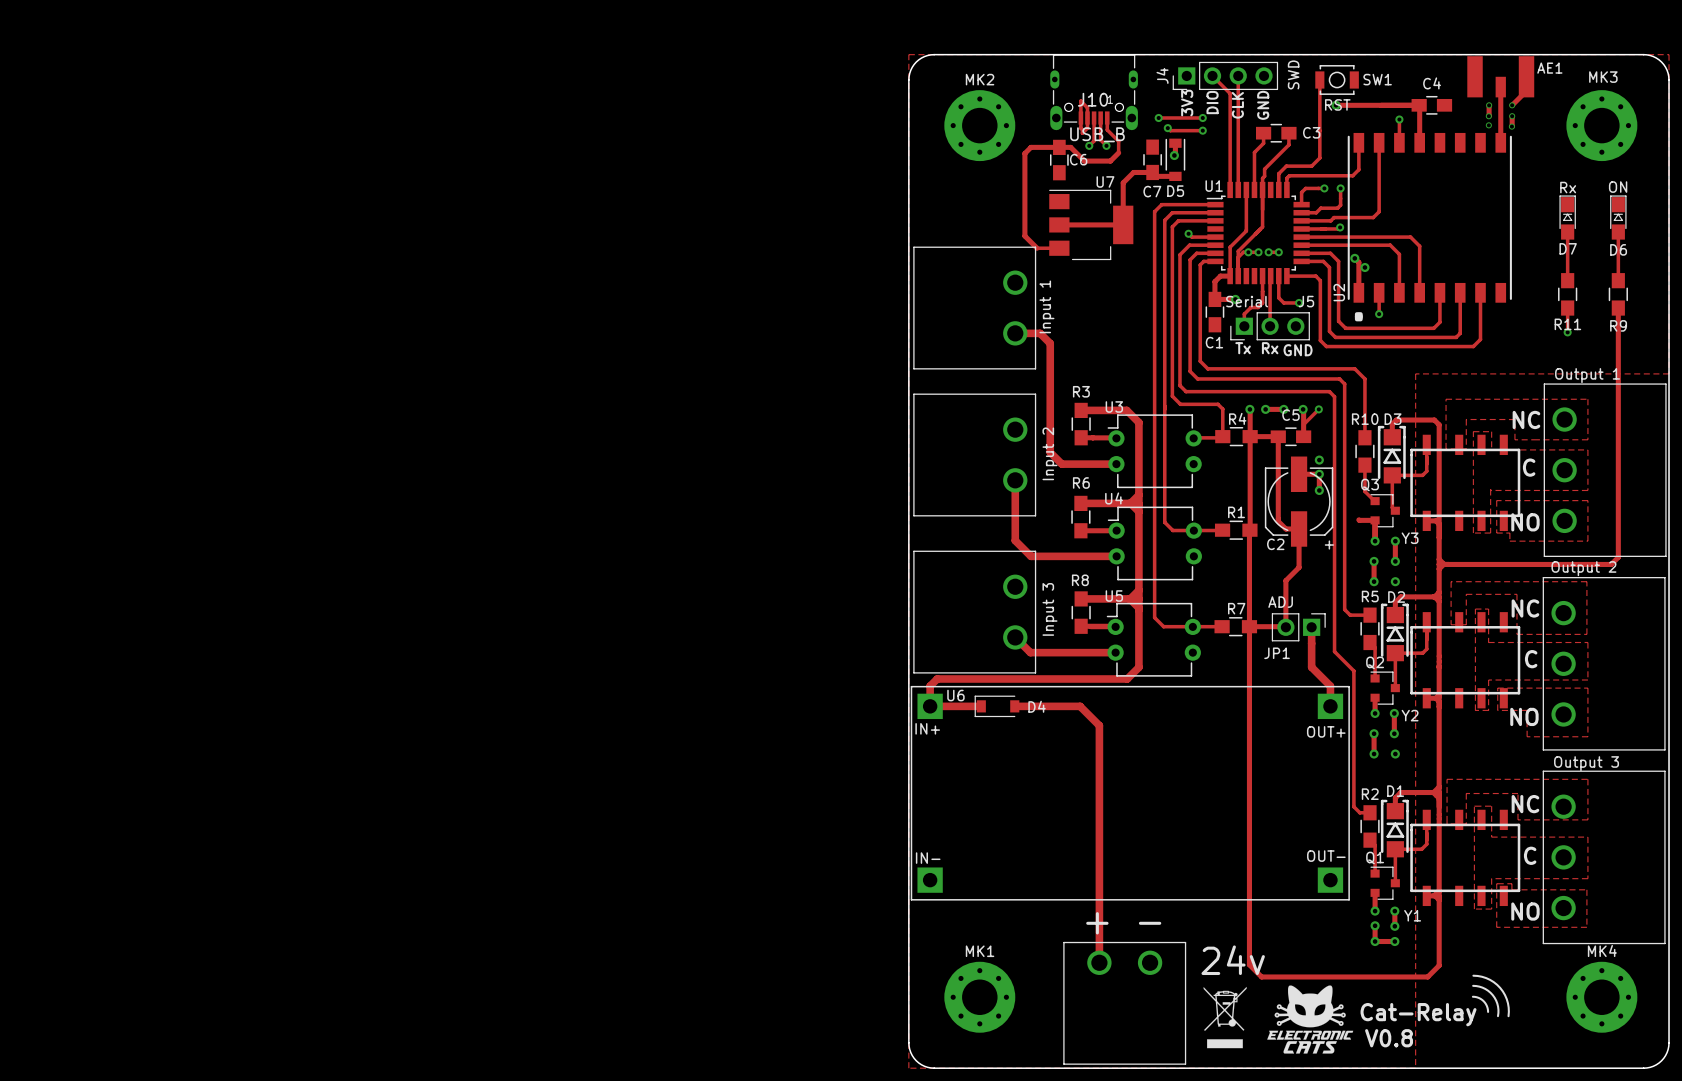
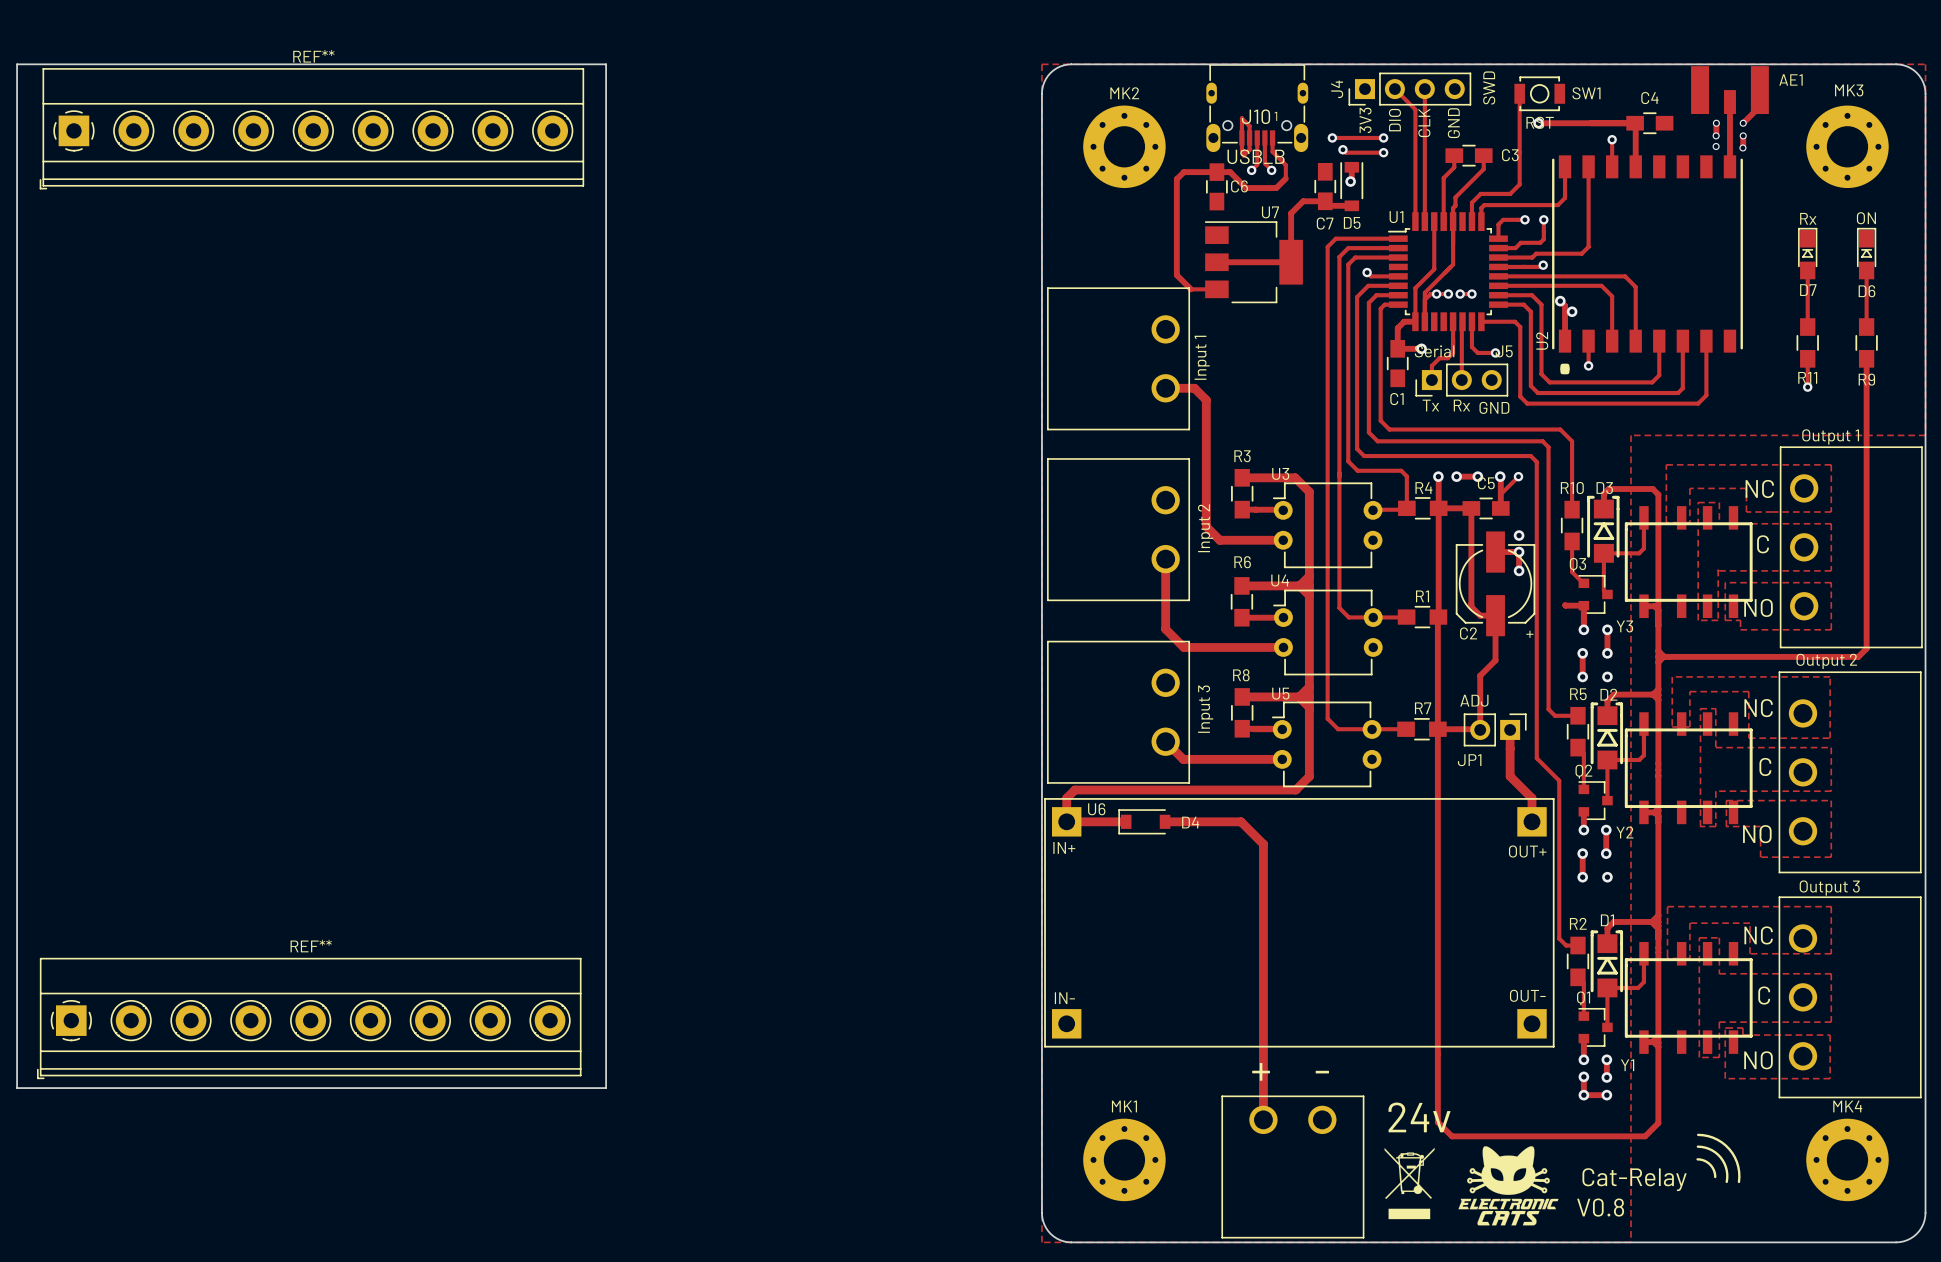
board edge: none -> (17, 64) (17, 1088) (606, 1088) (606, 64) (17, 64)
REF**: none -> (311, 128)
REF**: none -> (309, 1018)

